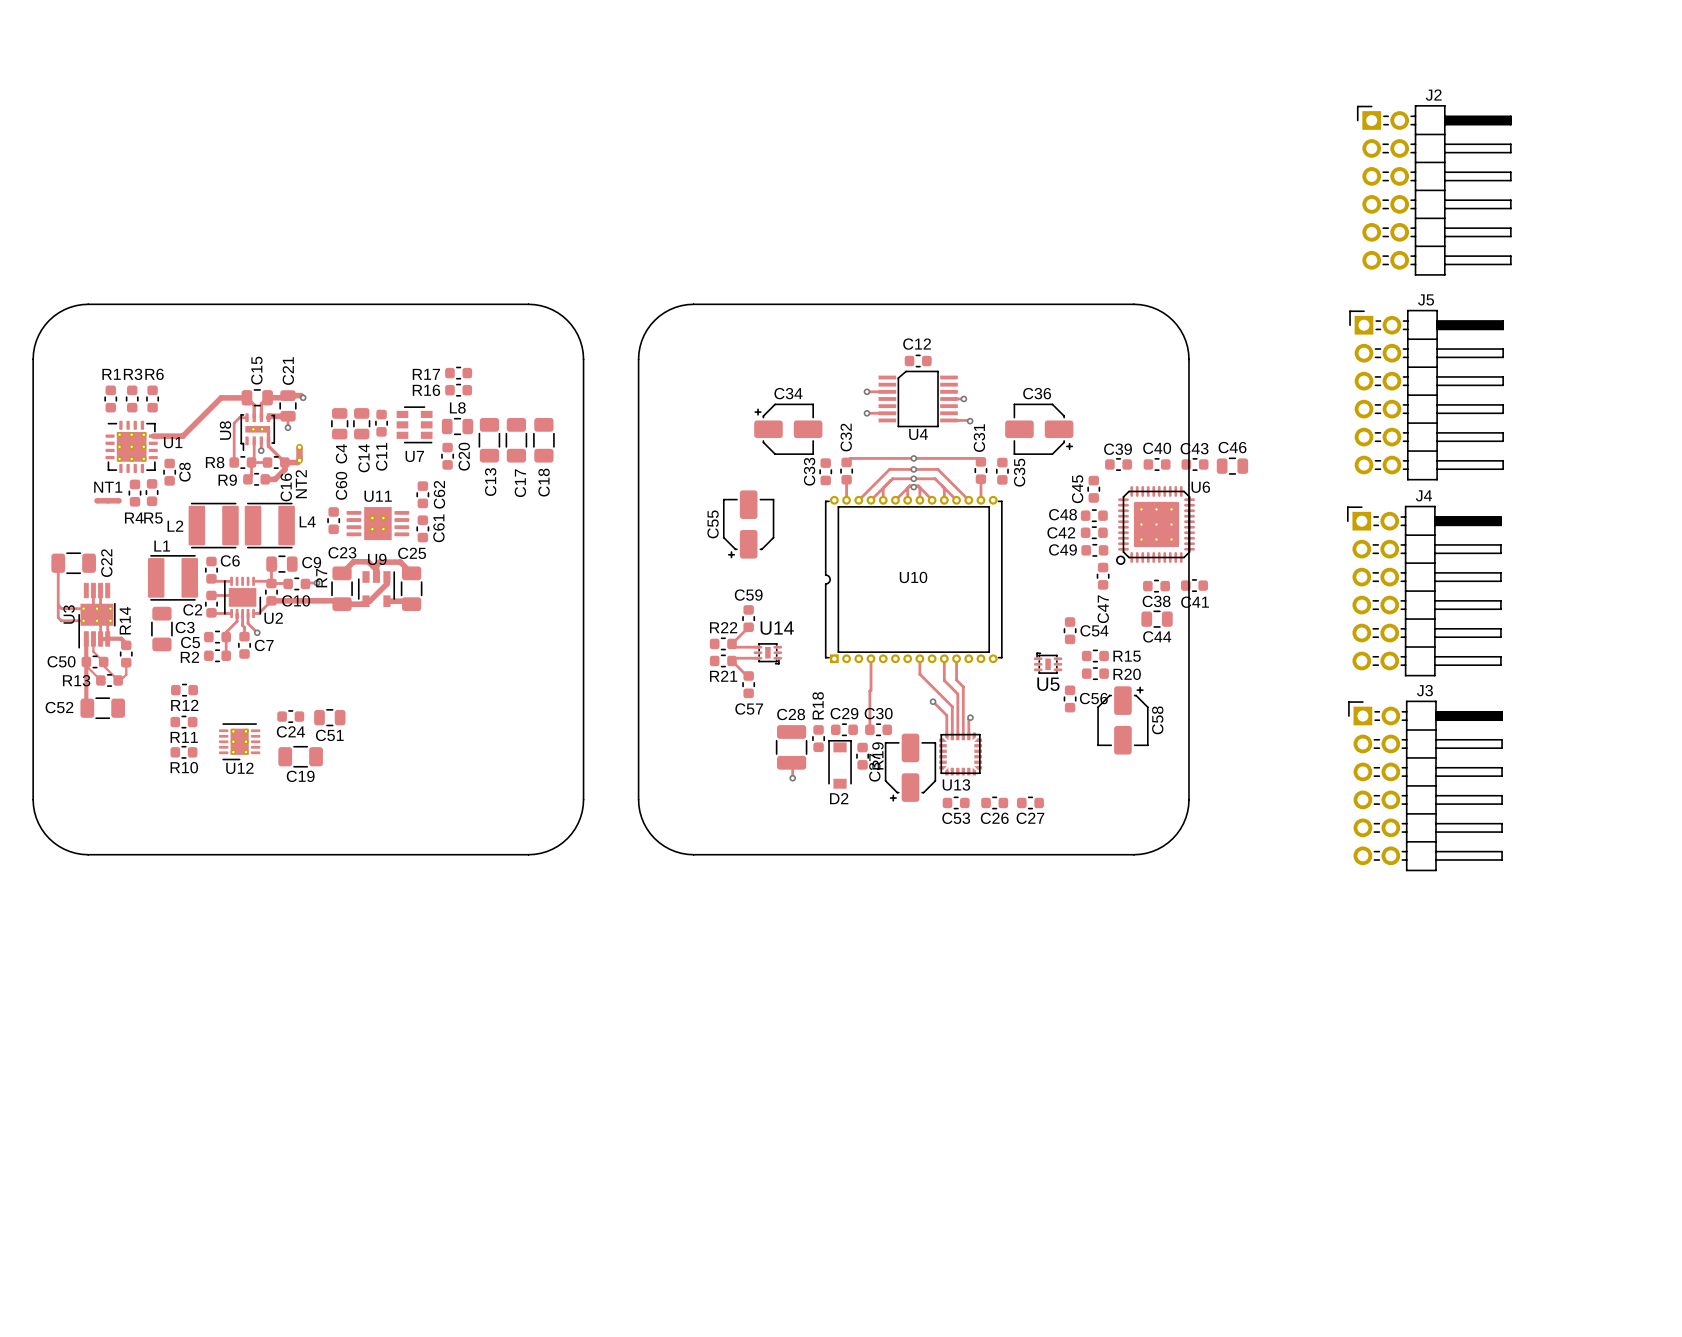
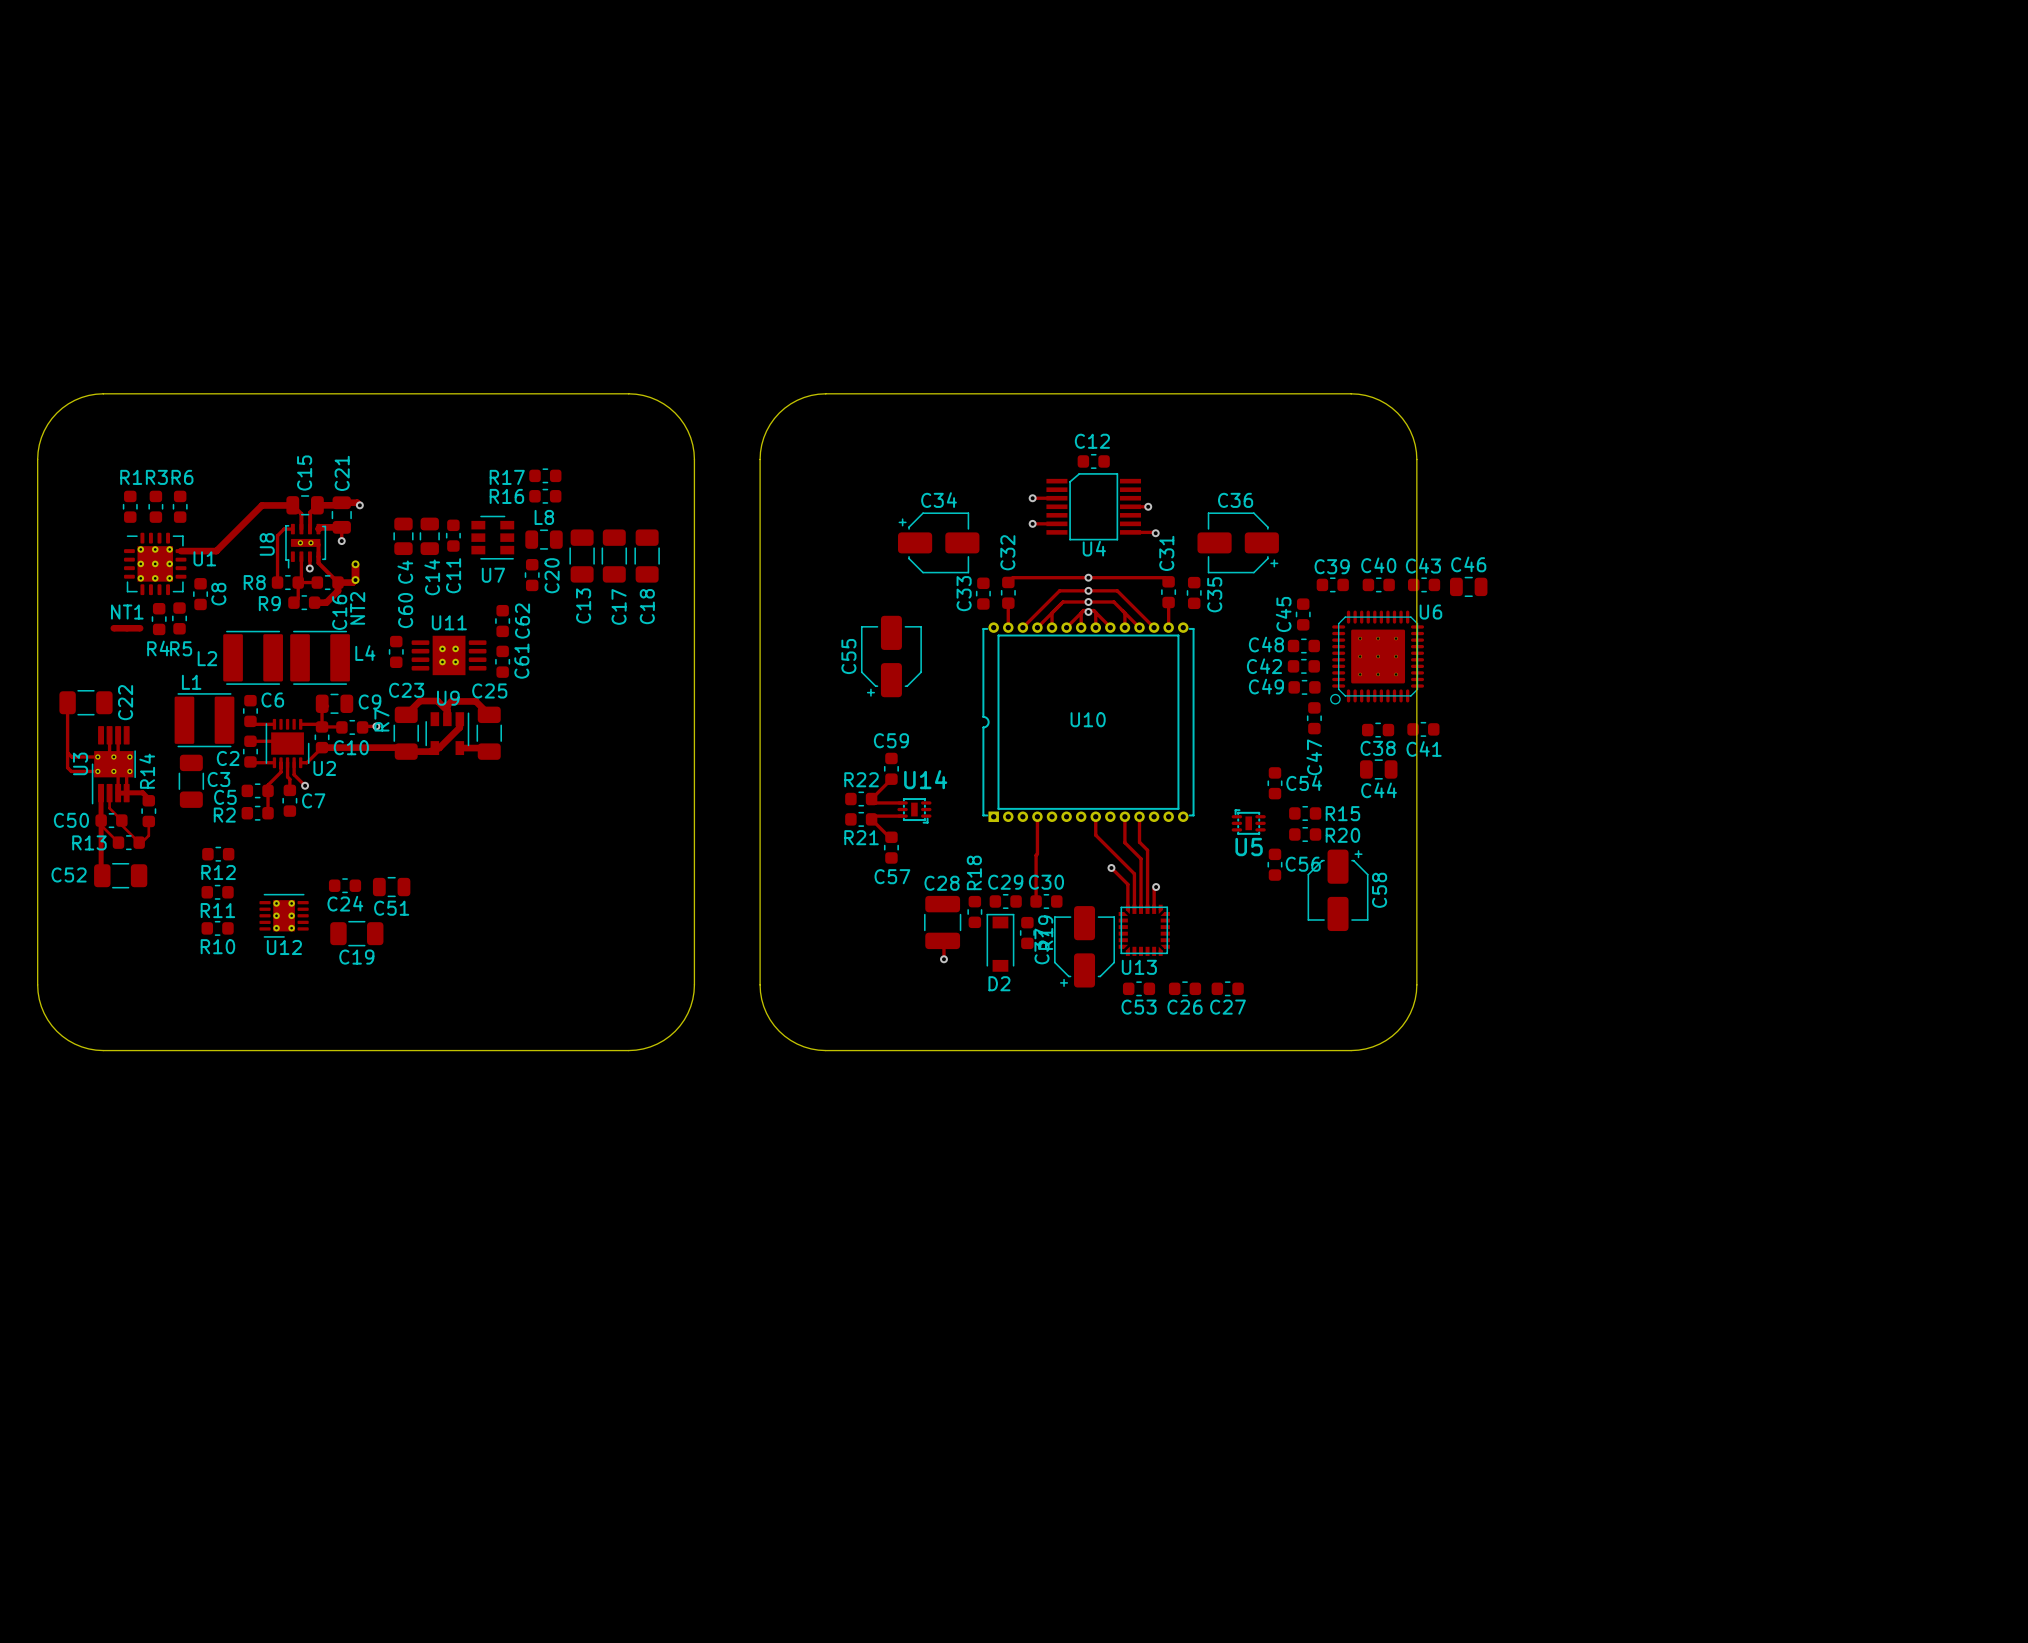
J2: (1434, 190) -> none
J5: (1426, 395) -> none
J4: (1424, 591) -> none
J3: (1425, 785) -> none

